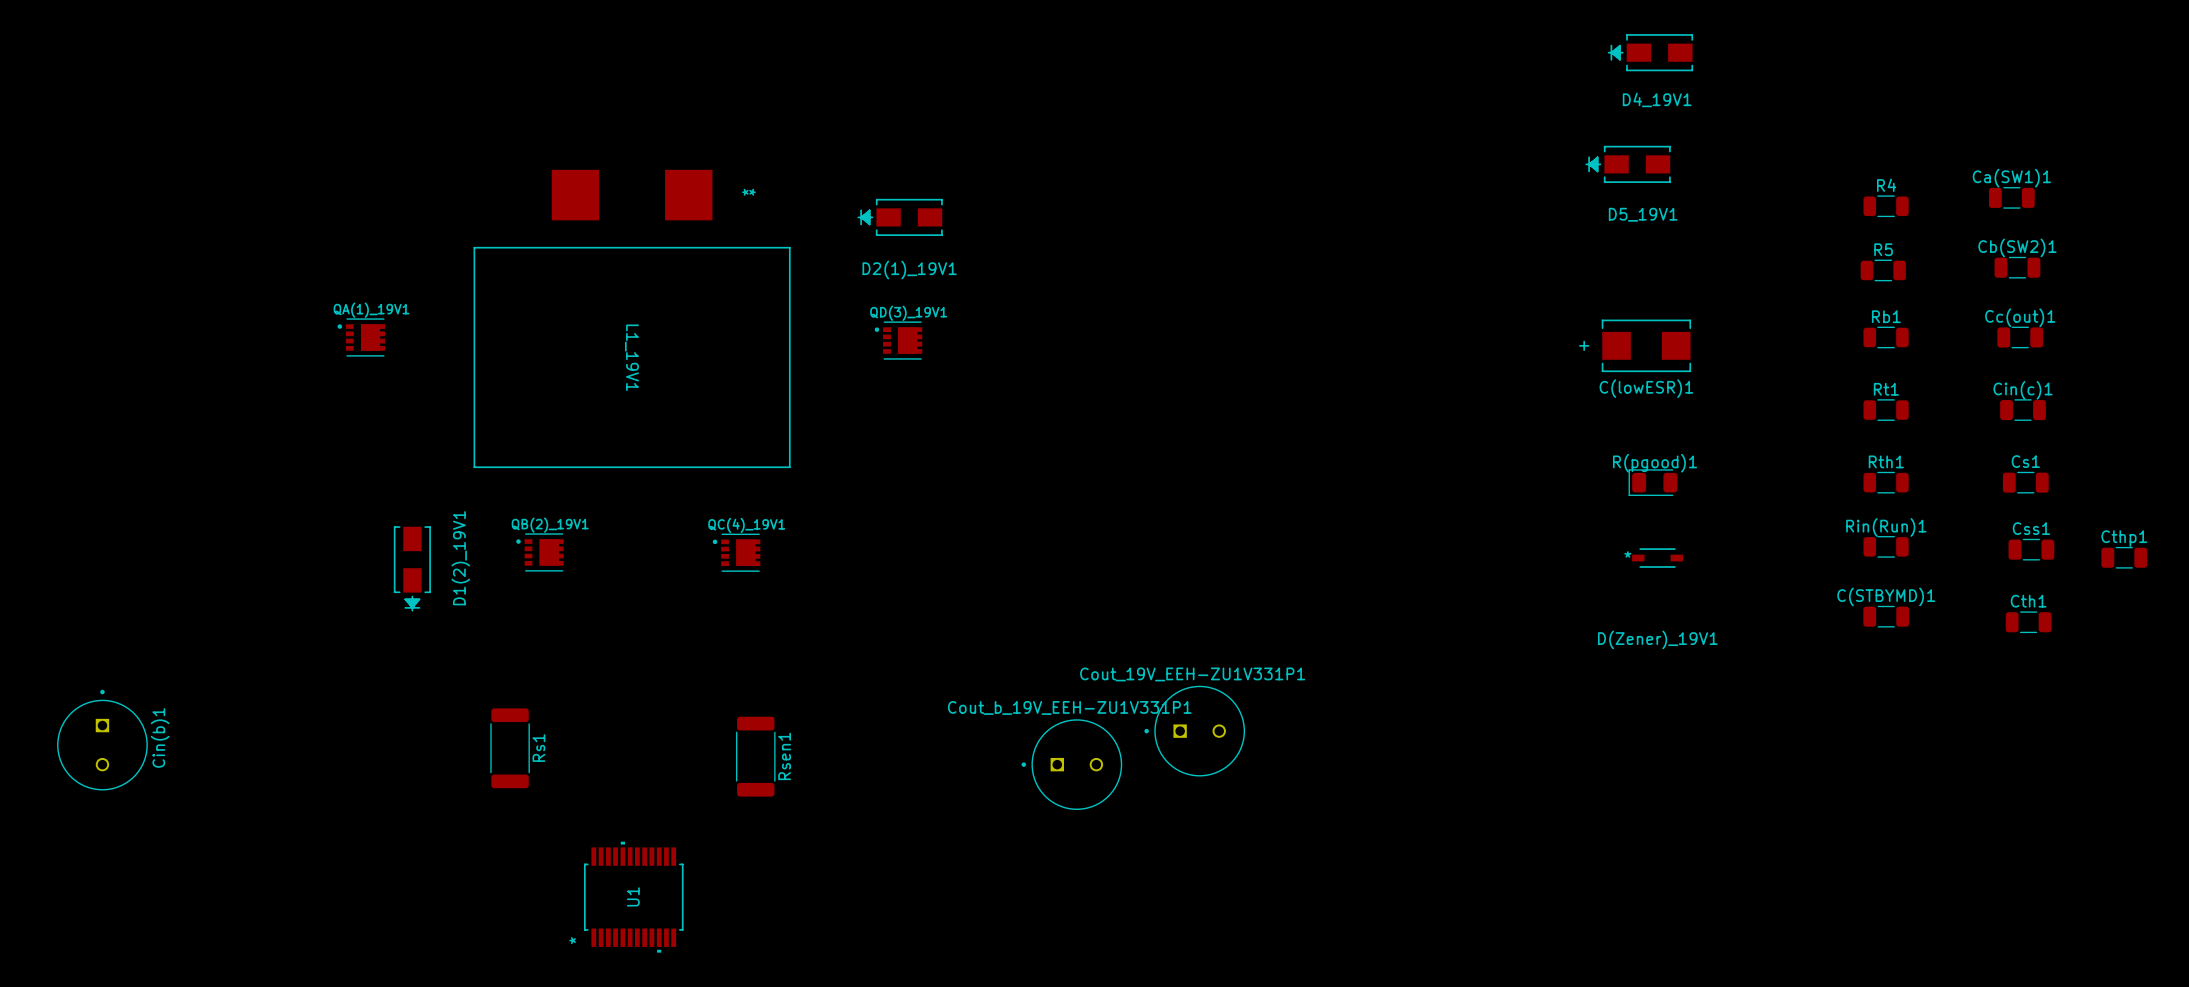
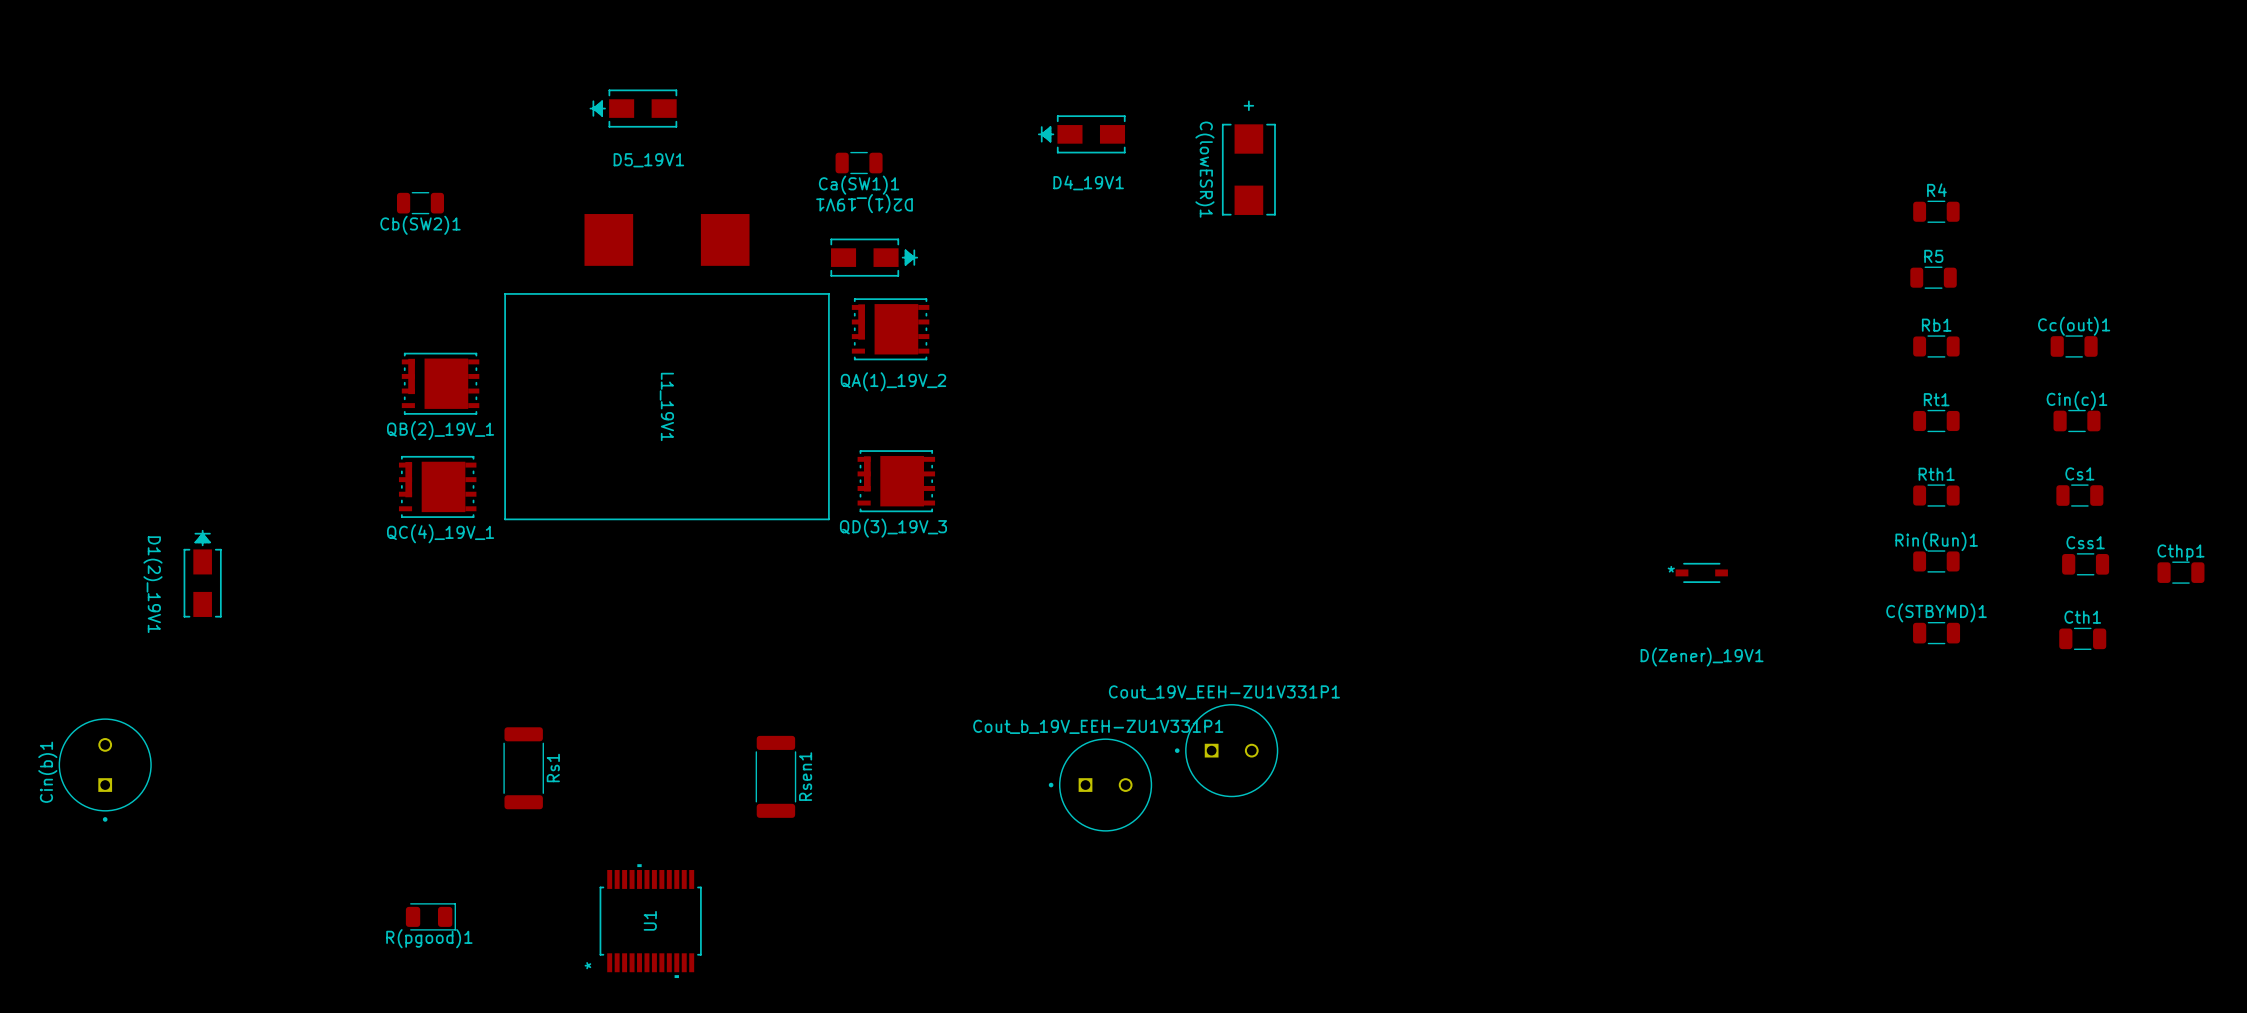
D4_19V1 position: (1650, 52) -> (1081, 134)
D5_19V1 position: (1628, 164) -> (633, 108)
L1_19V1 footprint: [473, 169, 791, 469] -> [504, 214, 830, 521]
Ca(SW1)1 name position: Ca(SW1)1 (2011, 178) -> Ca(SW1)1 (859, 185)
Ca(SW1)1 position: (2011, 197) -> (859, 163)
D2(1)_19V1 rotation: 0° (900, 217) -> 180° (874, 257)
D2(1)_19V1 position: (900, 217) -> (874, 257)
Cb(SW2)1 name position: Cb(SW2)1 (2017, 247) -> Cb(SW2)1 (420, 225)
Cb(SW2)1 position: (2017, 267) -> (420, 203)
QA(1)_19V_2: none -> (890, 329)
QA(1)_19V1: (361, 337) -> none
QD(3)_19V1: (898, 340) -> none
C(lowESR)1 rotation: 0° (1635, 345) -> 90° clockwise (1248, 158)
C(lowESR)1 position: (1635, 345) -> (1248, 158)
QB(2)_19V_1: none -> (440, 383)
QD(3)_19V_3: none -> (896, 481)
QC(4)_19V_1: none -> (437, 486)
R(pgood)1 rotation: 0° (1652, 482) -> 180° (430, 916)
R(pgood)1 position: (1652, 482) -> (430, 916)
QB(2)_19V1: (539, 552) -> none
QC(4)_19V1: (736, 552) -> none
D1(2)_19V1 rotation: 0° (412, 568) -> 180° (202, 573)
D1(2)_19V1 position: (412, 568) -> (202, 573)
Cin(b)1 rotation: 0° (102, 740) -> 180° (105, 770)

